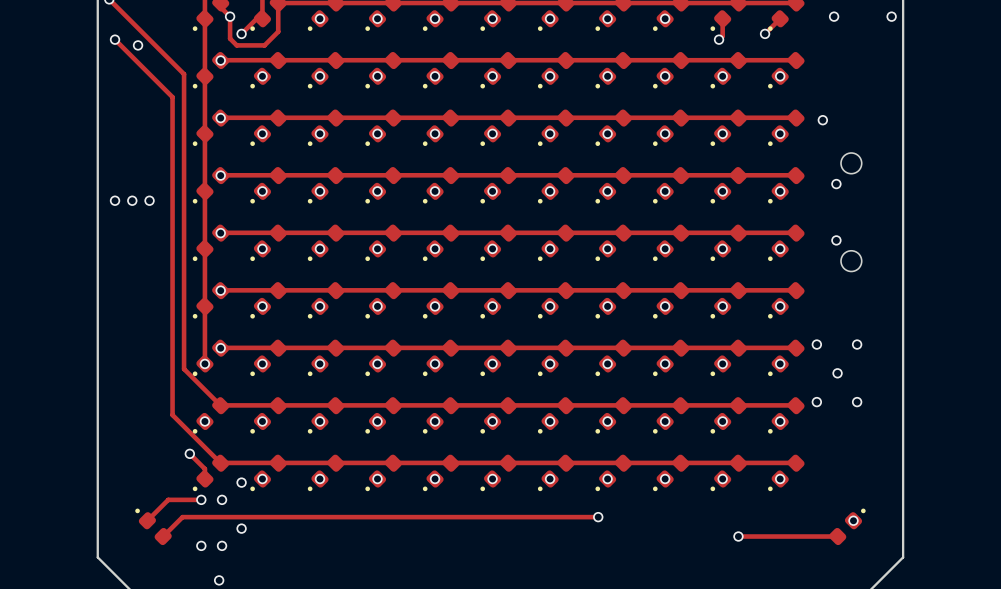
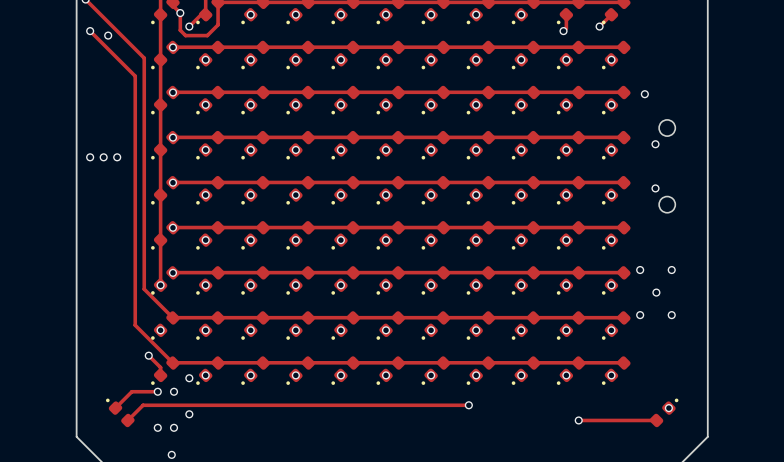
via: (834, 16) -> none
via: (891, 16) -> none

